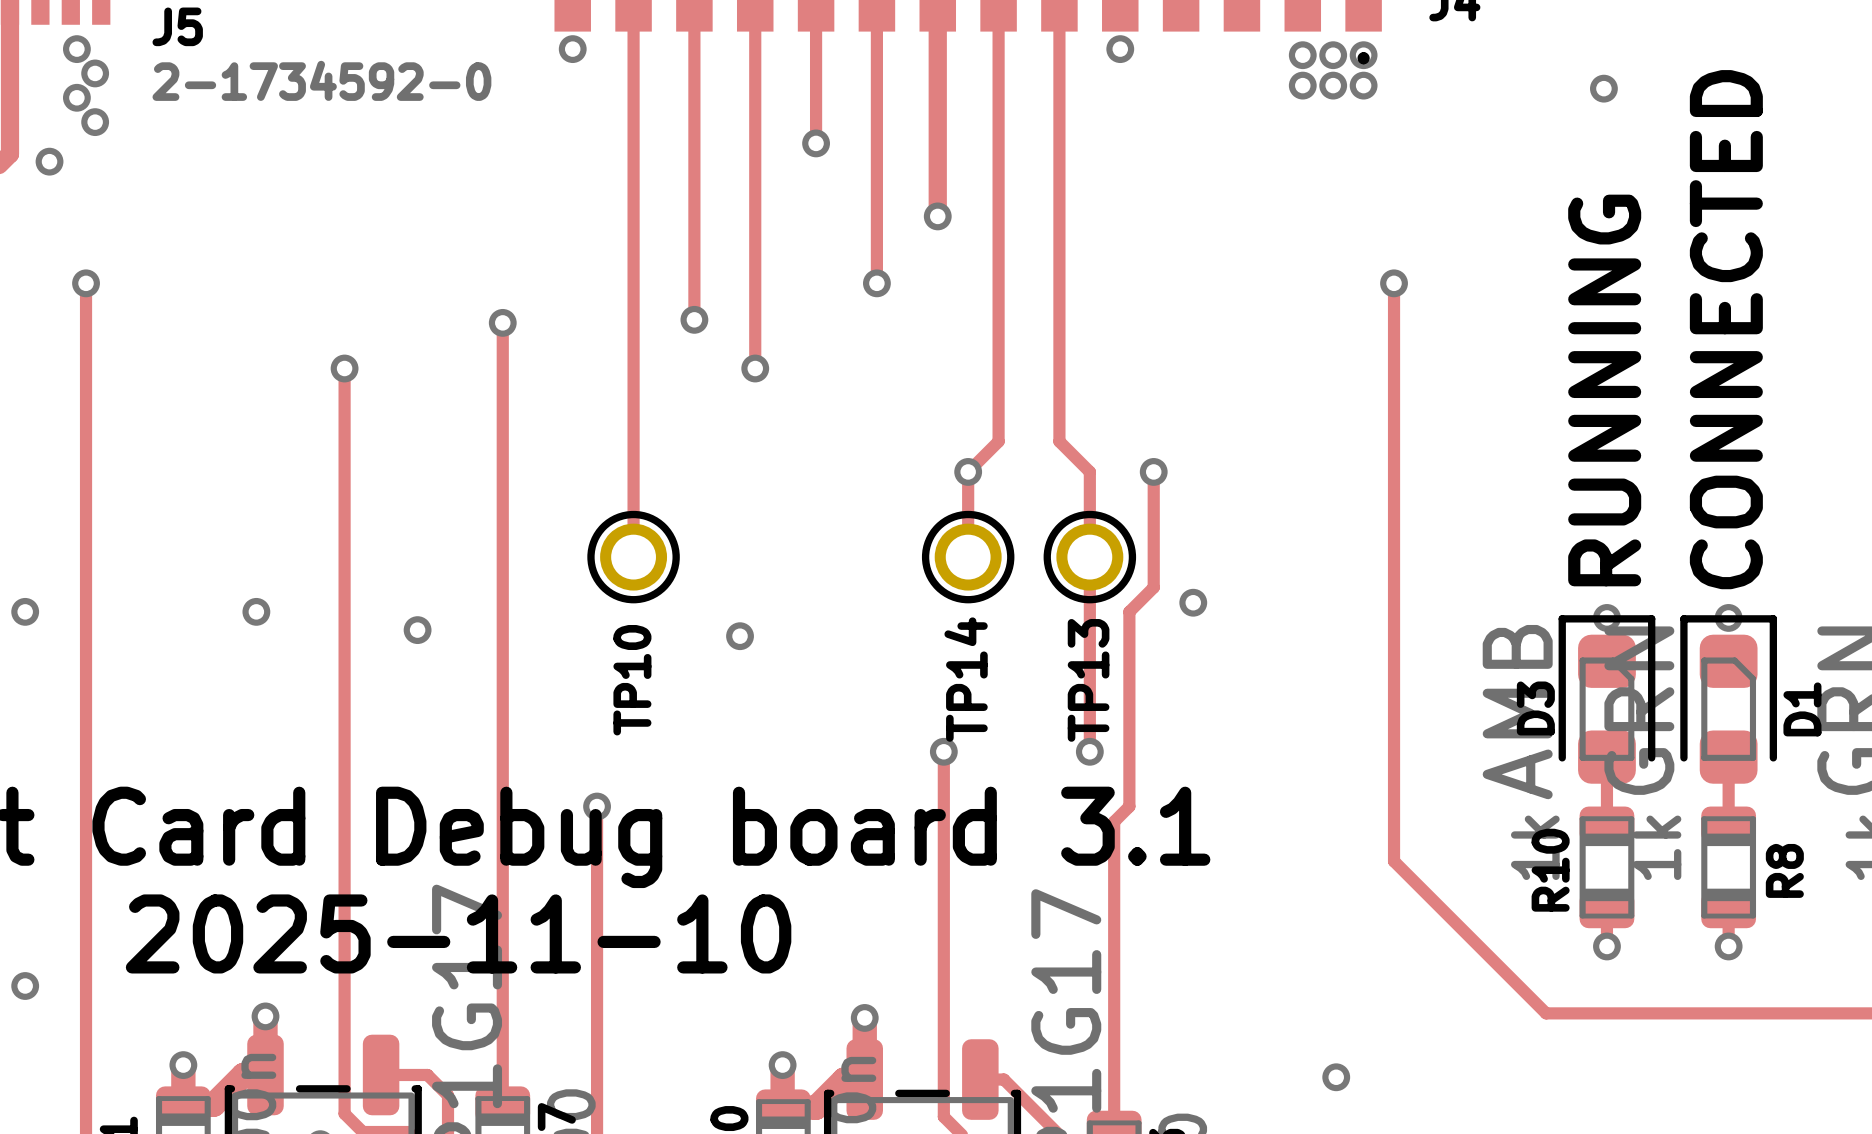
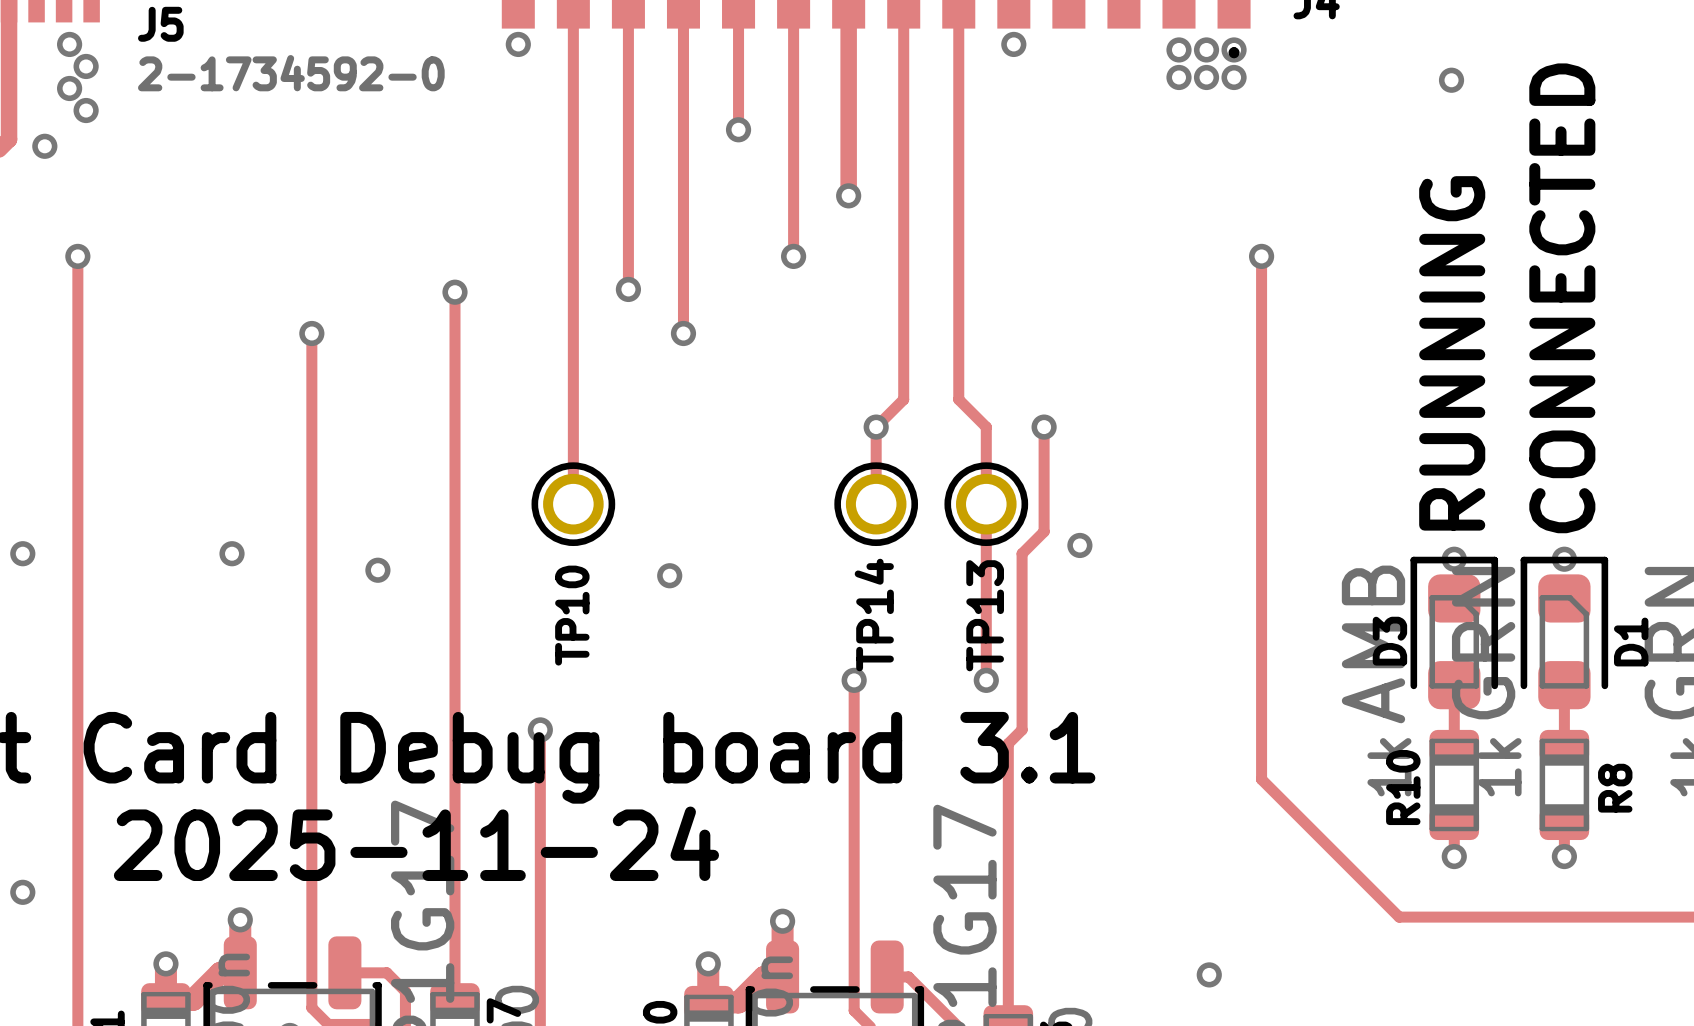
text: 2025-11-10 (458, 933) -> 2025-11-24 (416, 843)

